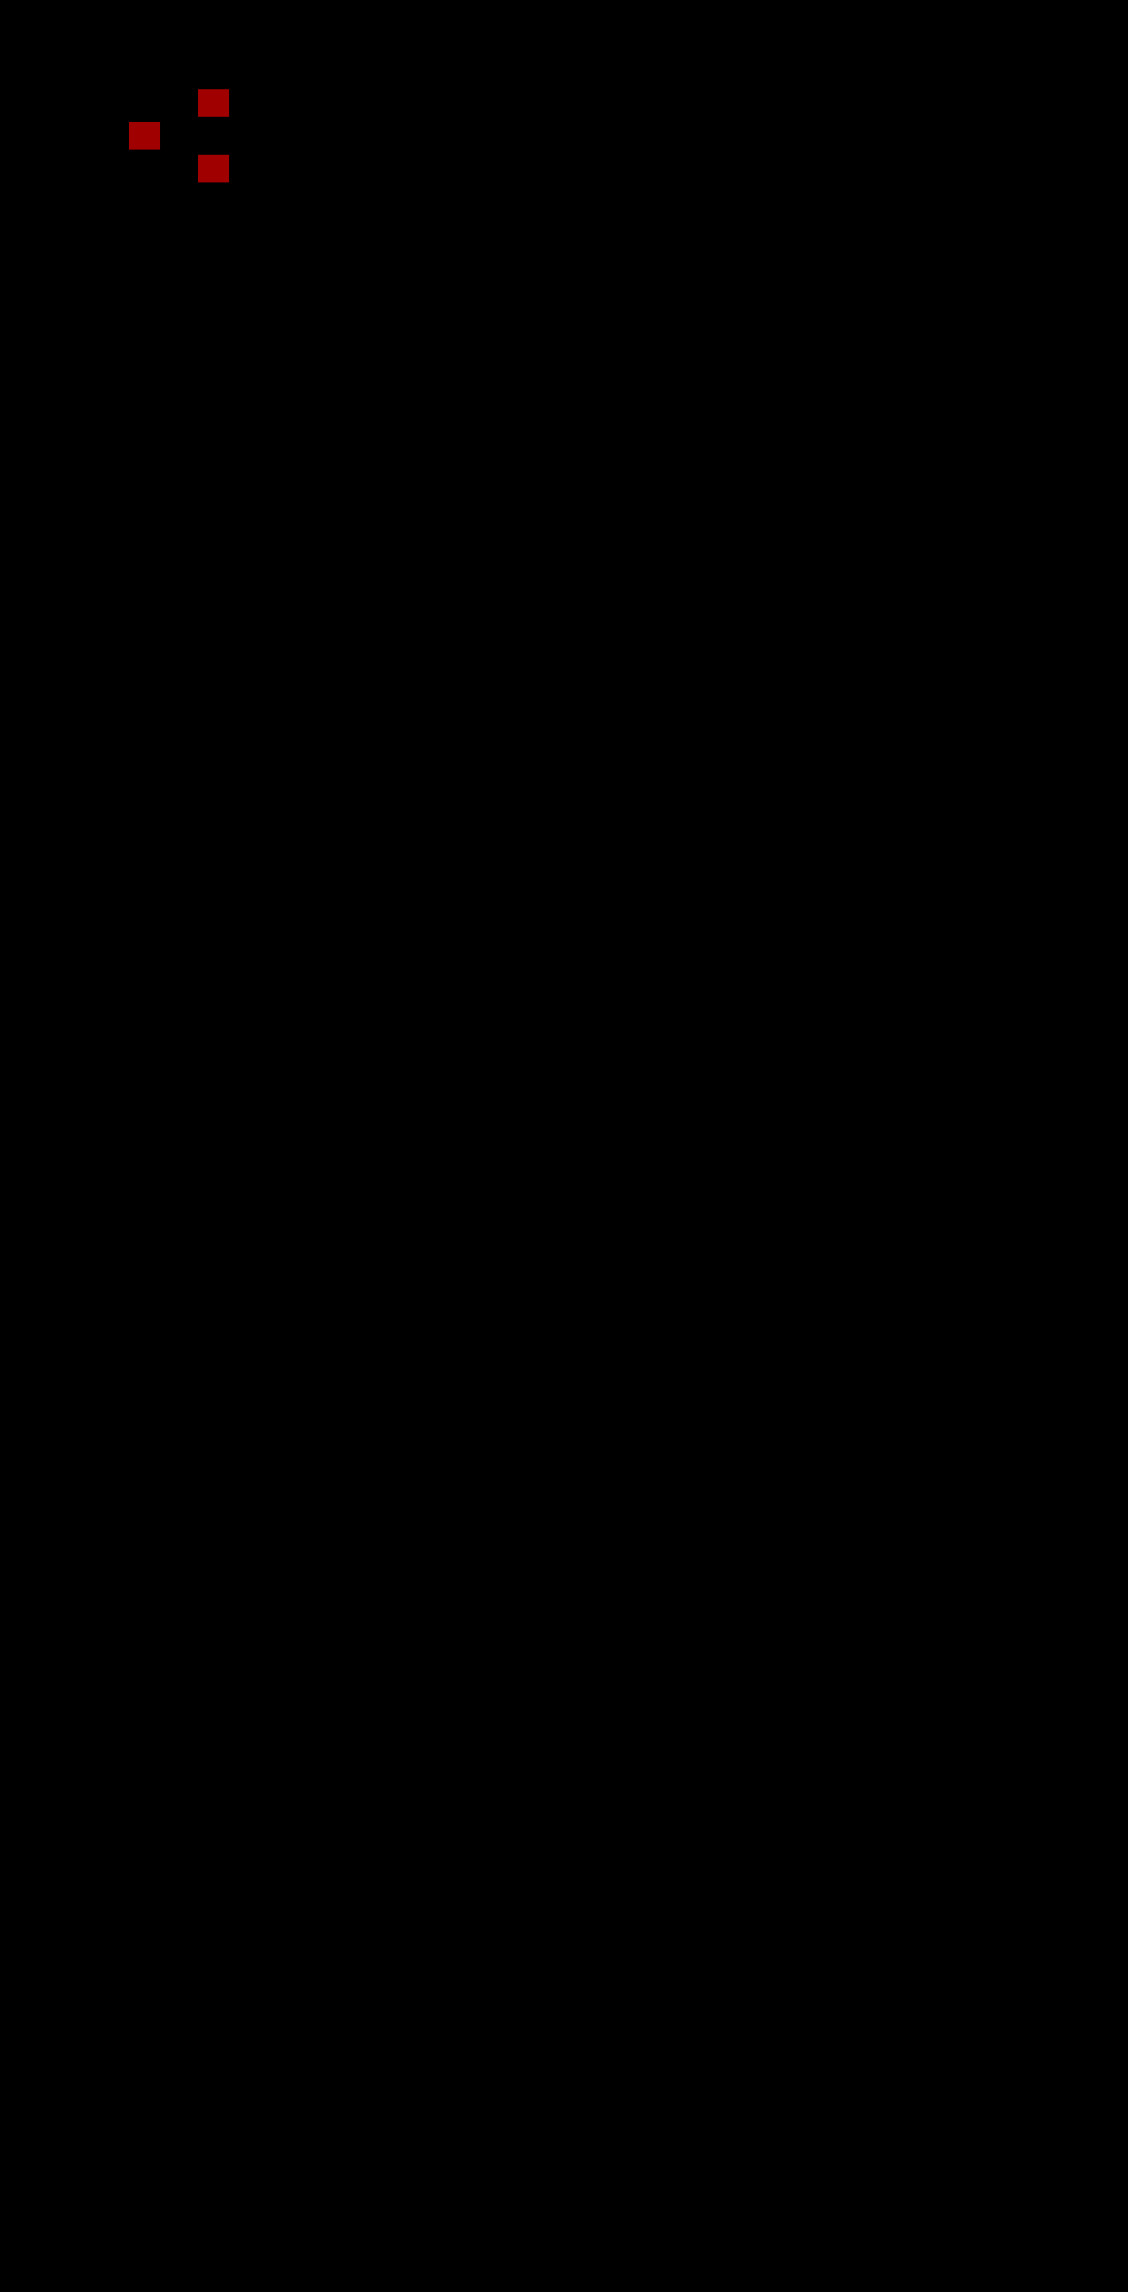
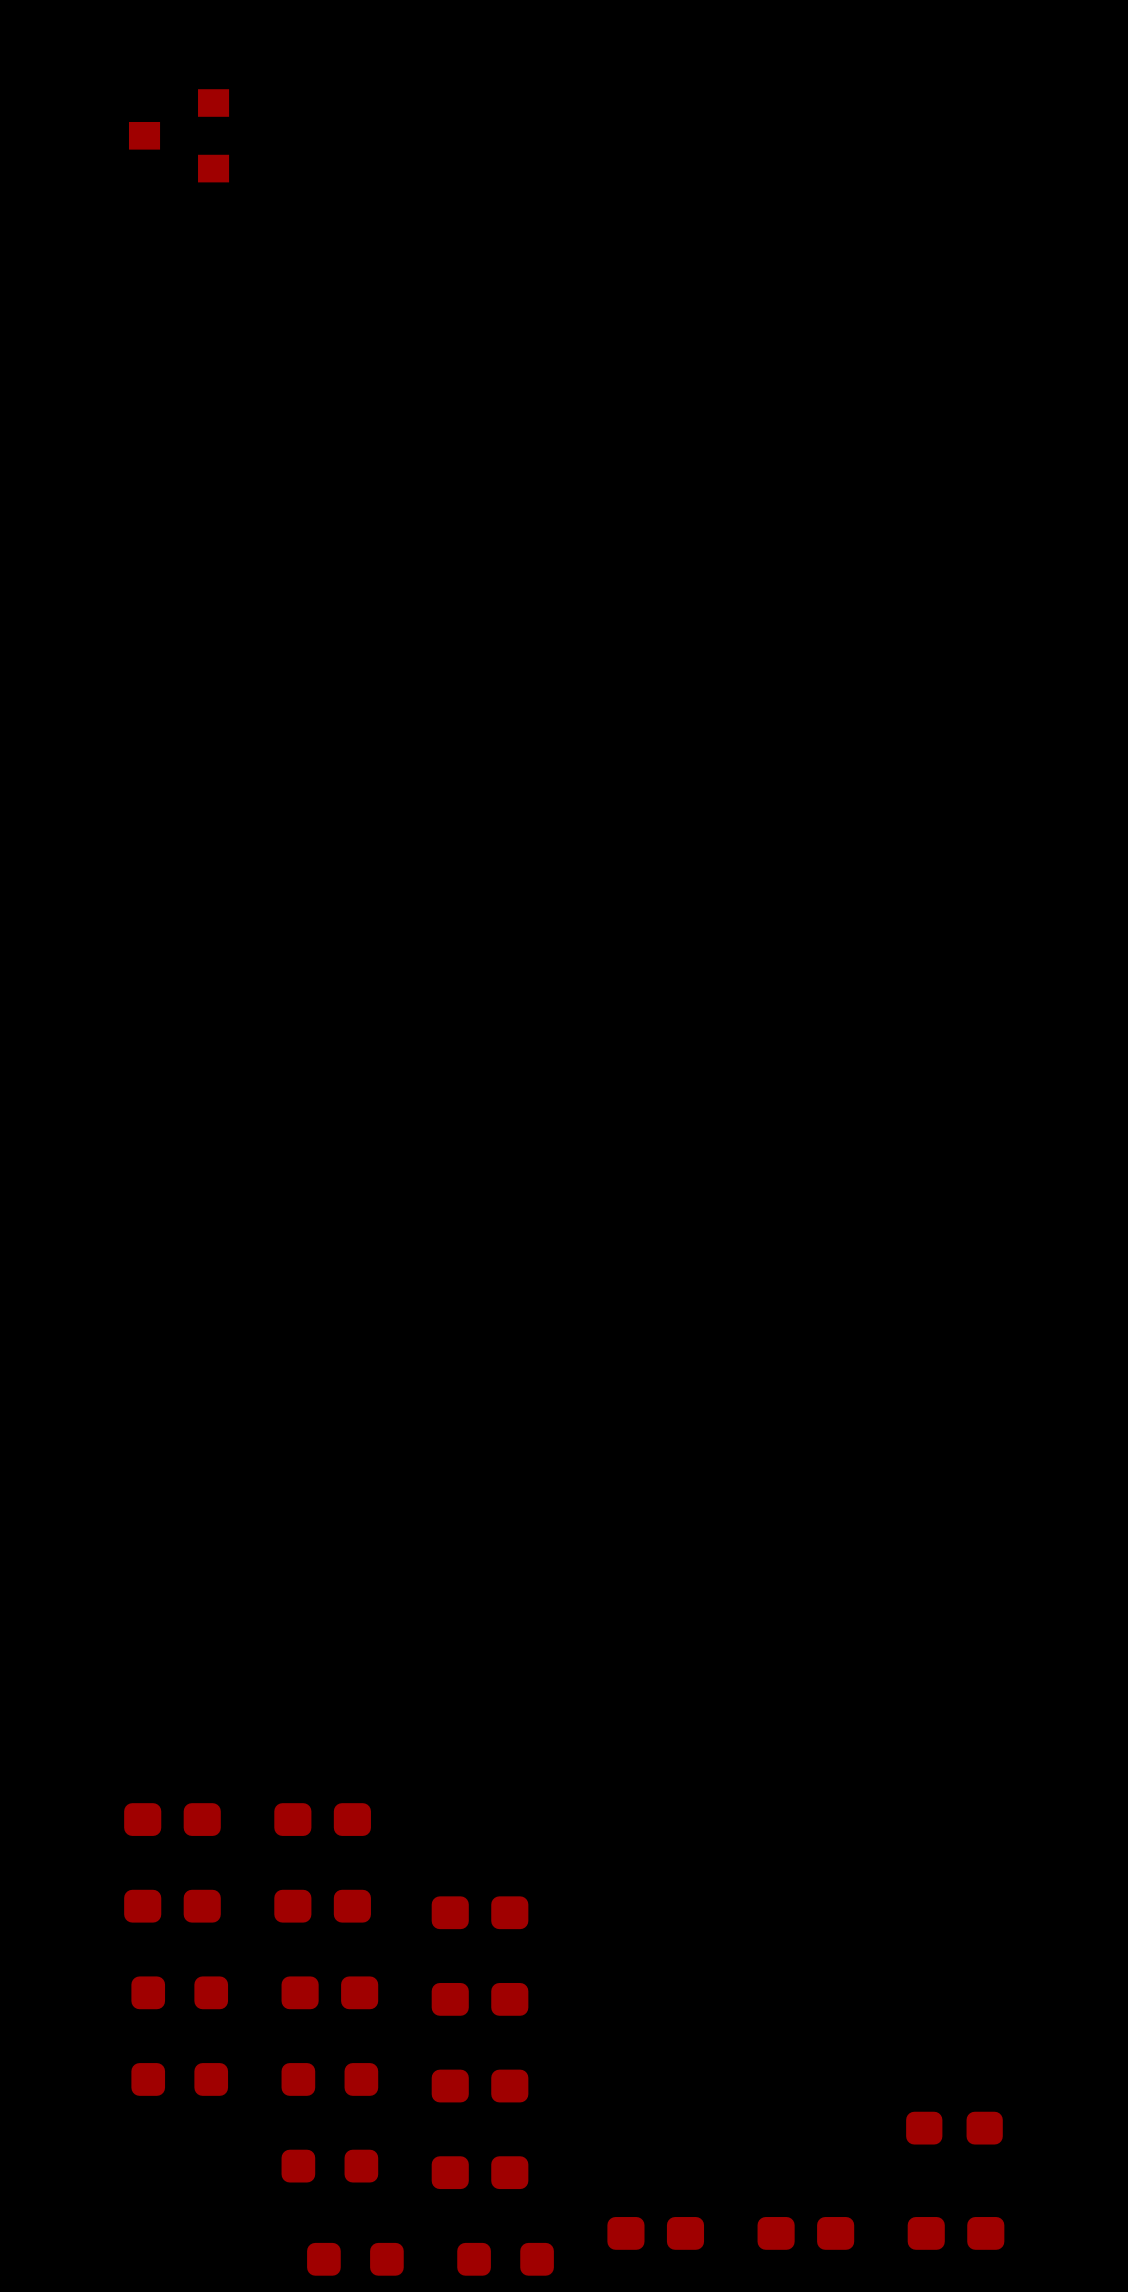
part: none -> (172, 1819)
part: none -> (322, 1819)
part: none -> (172, 1906)
part: none -> (322, 1906)
part: none -> (480, 1912)
part: none -> (179, 1992)
part: none -> (329, 1992)
part: none -> (480, 1999)
part: none -> (179, 2079)
part: none -> (329, 2079)
part: none -> (480, 2086)
part: none -> (954, 2128)
part: none -> (329, 2166)
part: none -> (480, 2172)
part: none -> (655, 2233)
part: none -> (805, 2233)
part: none -> (956, 2233)
part: none -> (355, 2259)
part: none -> (505, 2259)

